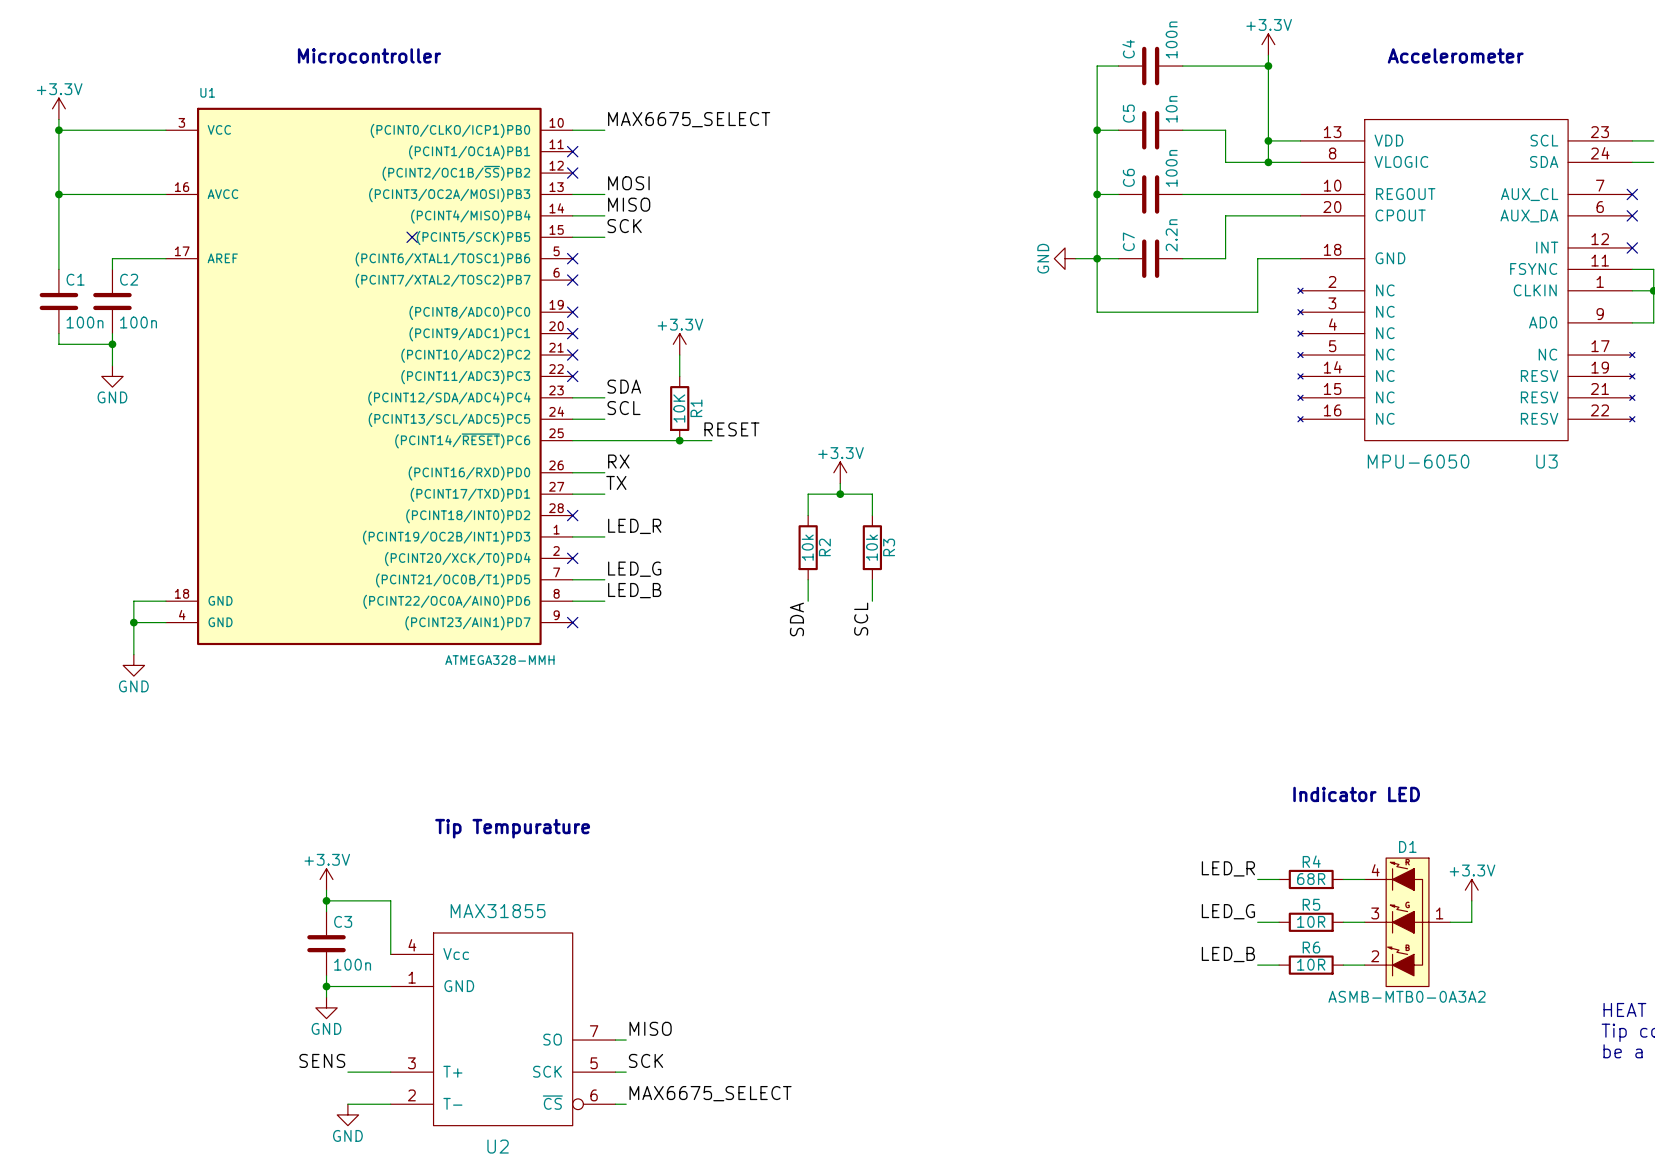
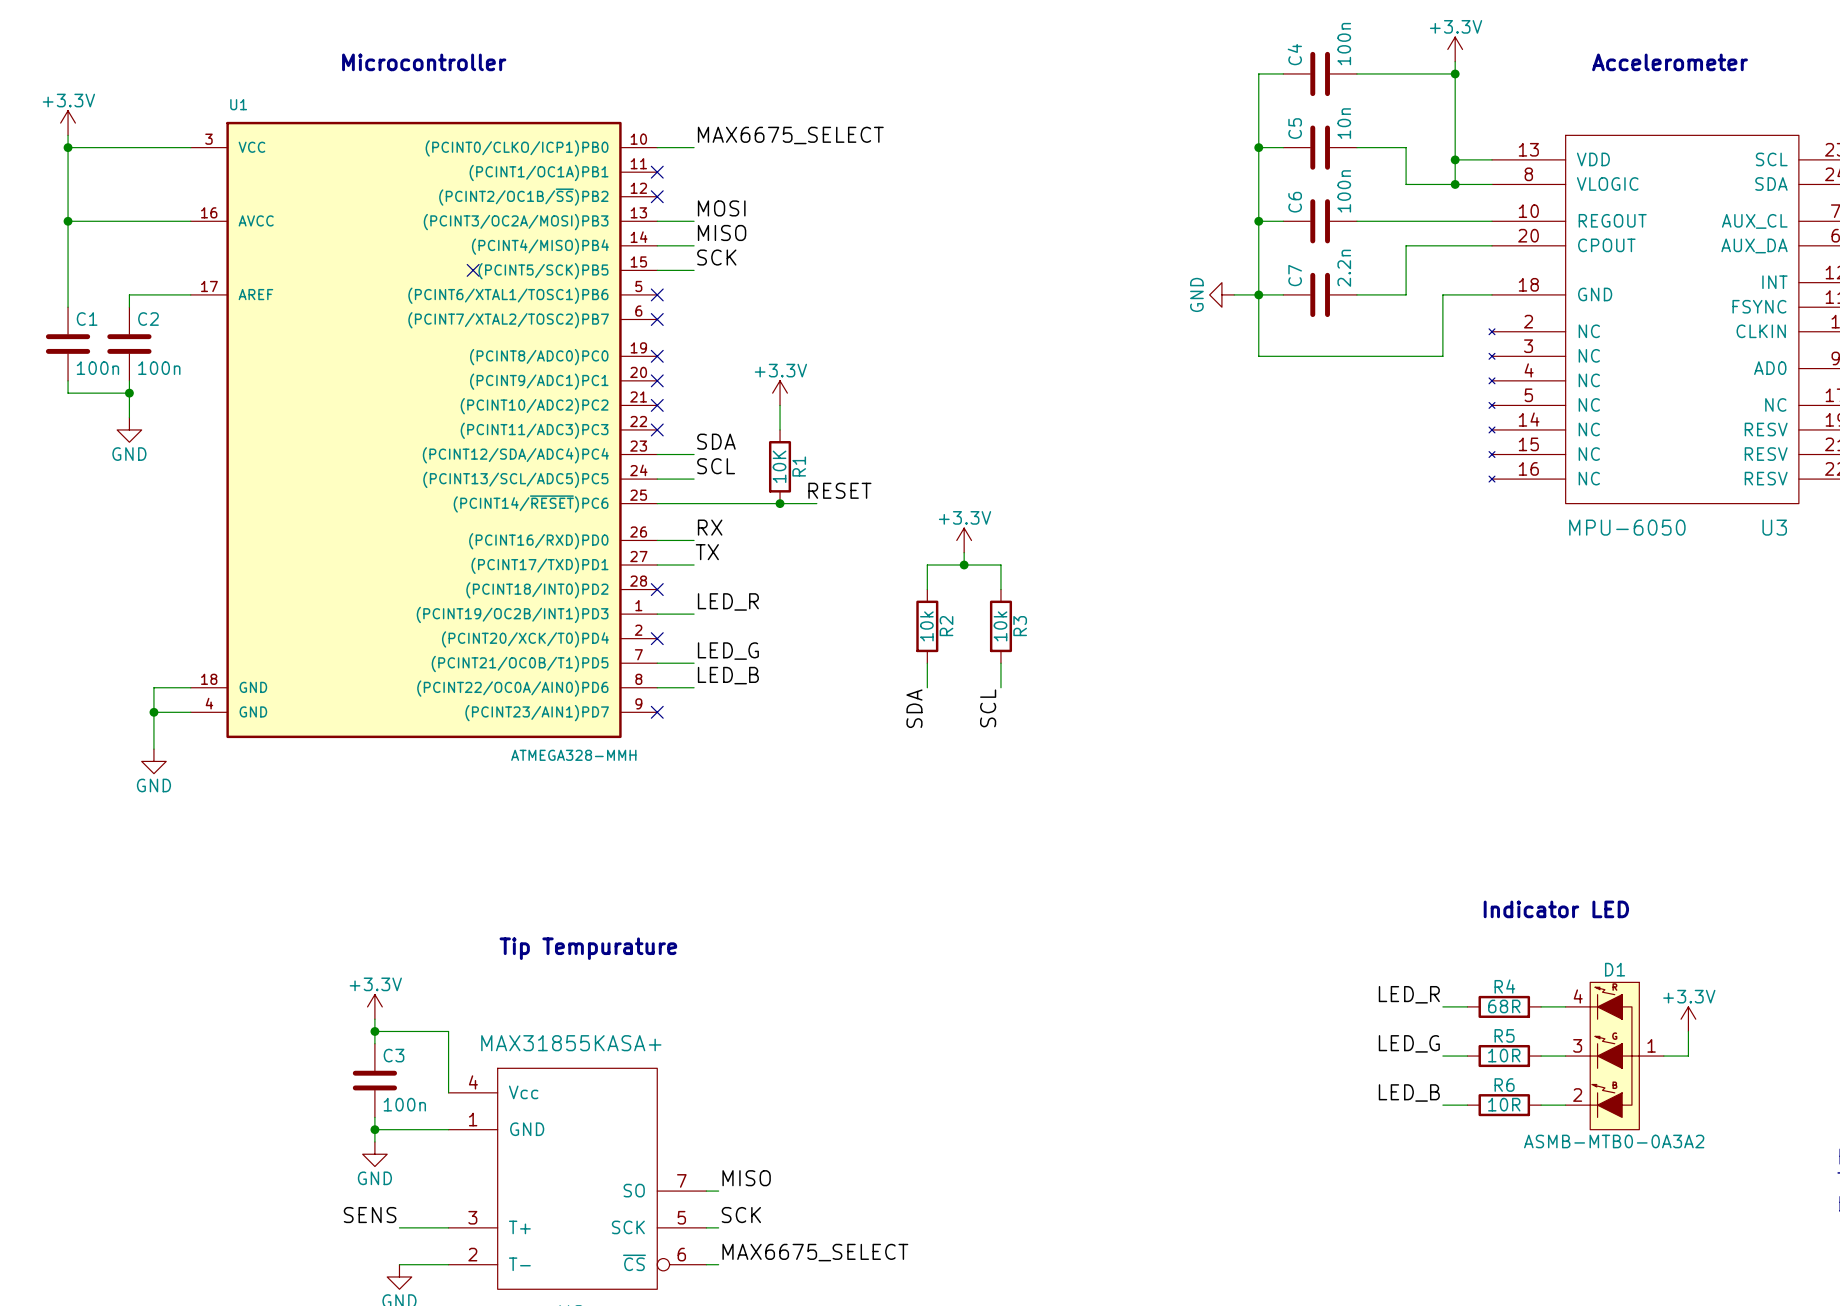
U2 value: MAX31855 (498, 911) -> MAX31855KASA+ (571, 1043)

